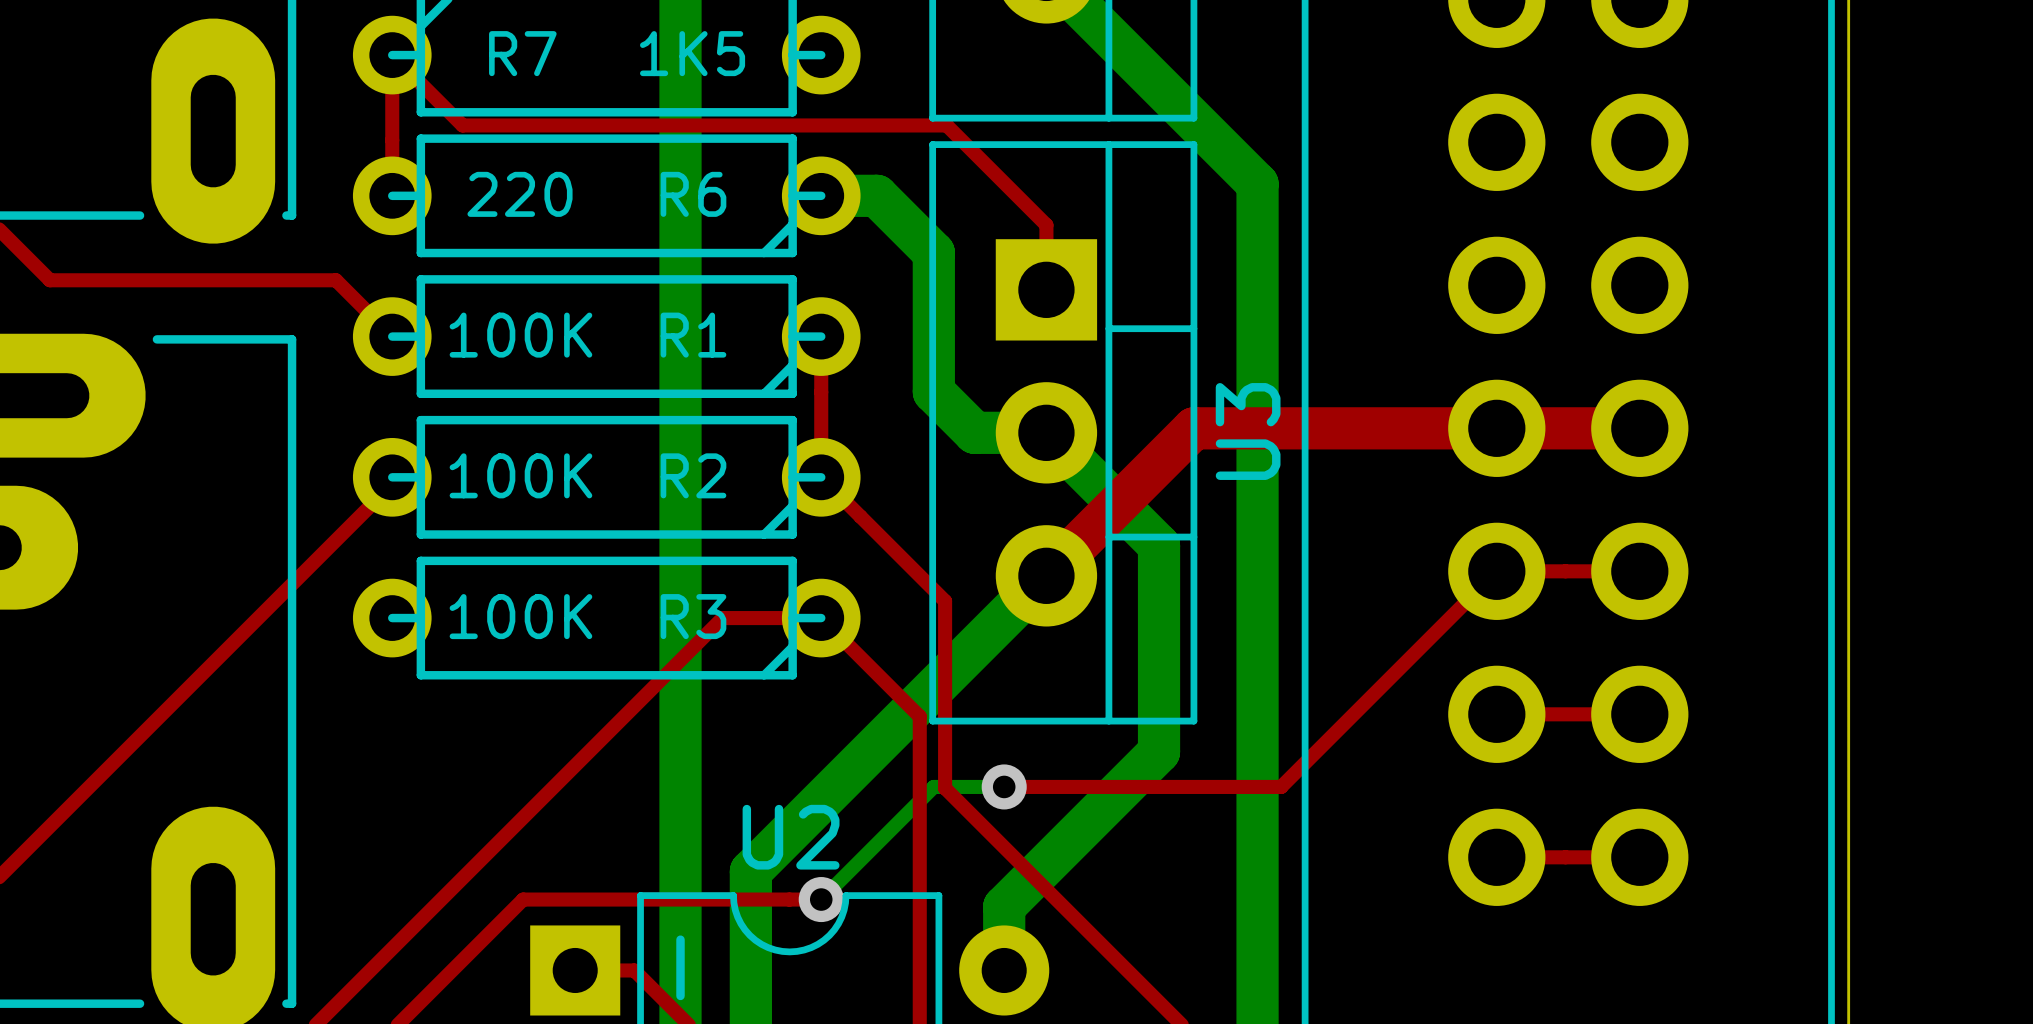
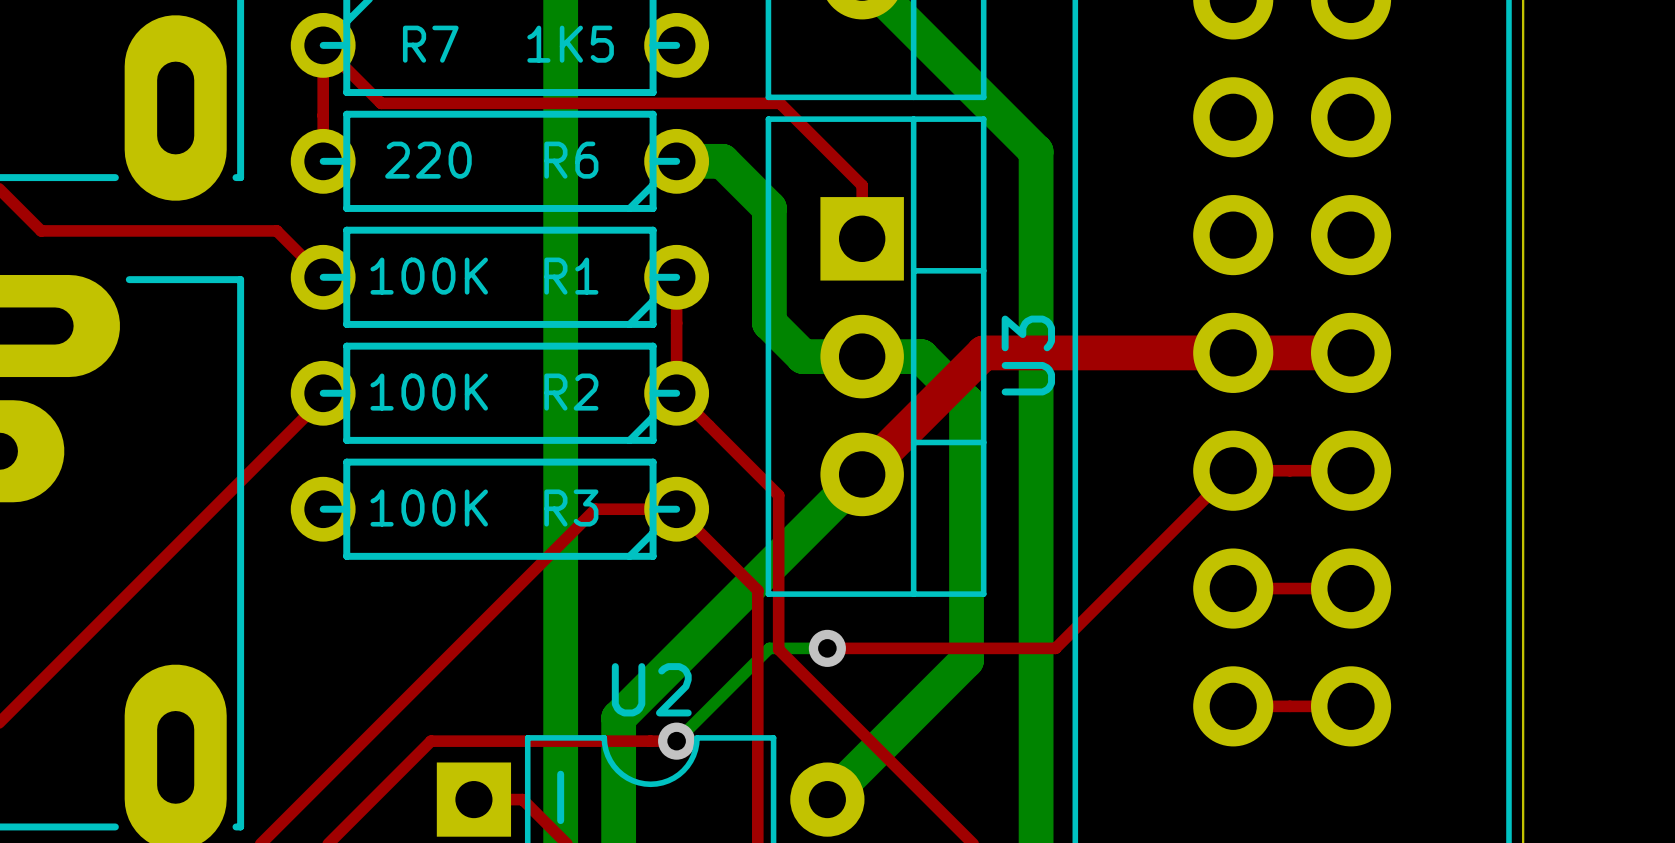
bottom track: (1046, 432) (1159, 545) (1159, 751) (1004, 906) (1004, 970) -> (862, 356) (921, 356) (966, 401) (966, 660) (827, 799)

